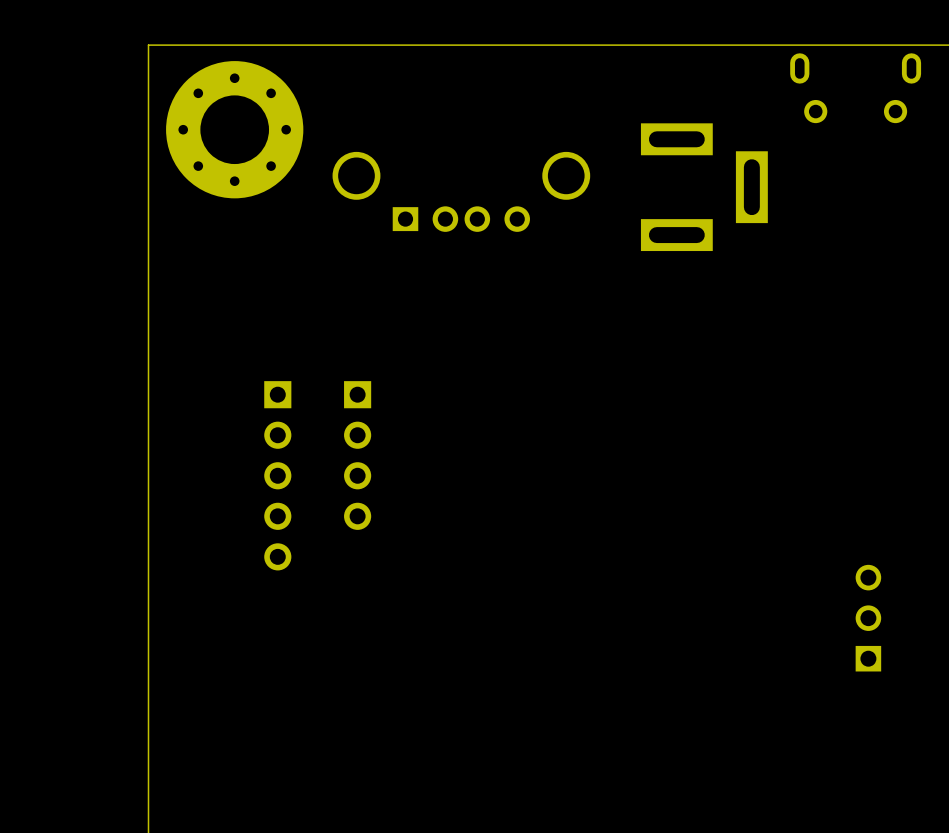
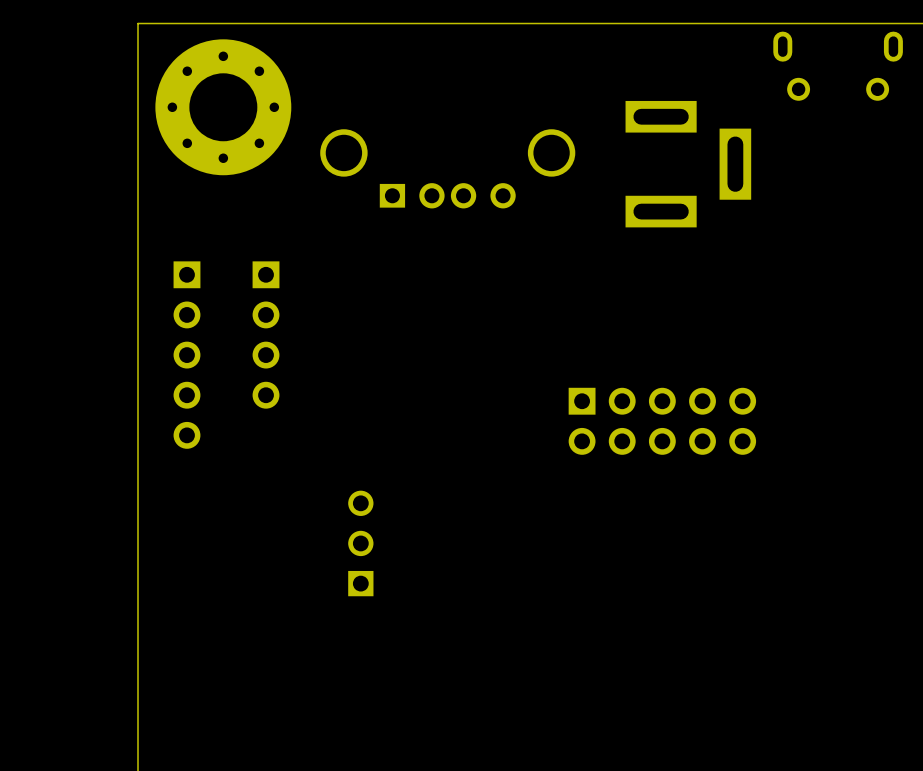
part: none -> (662, 421)
part position: (357, 455) -> (266, 335)
part position: (277, 475) -> (186, 355)
part: none -> (360, 543)
part: (868, 618) -> none

